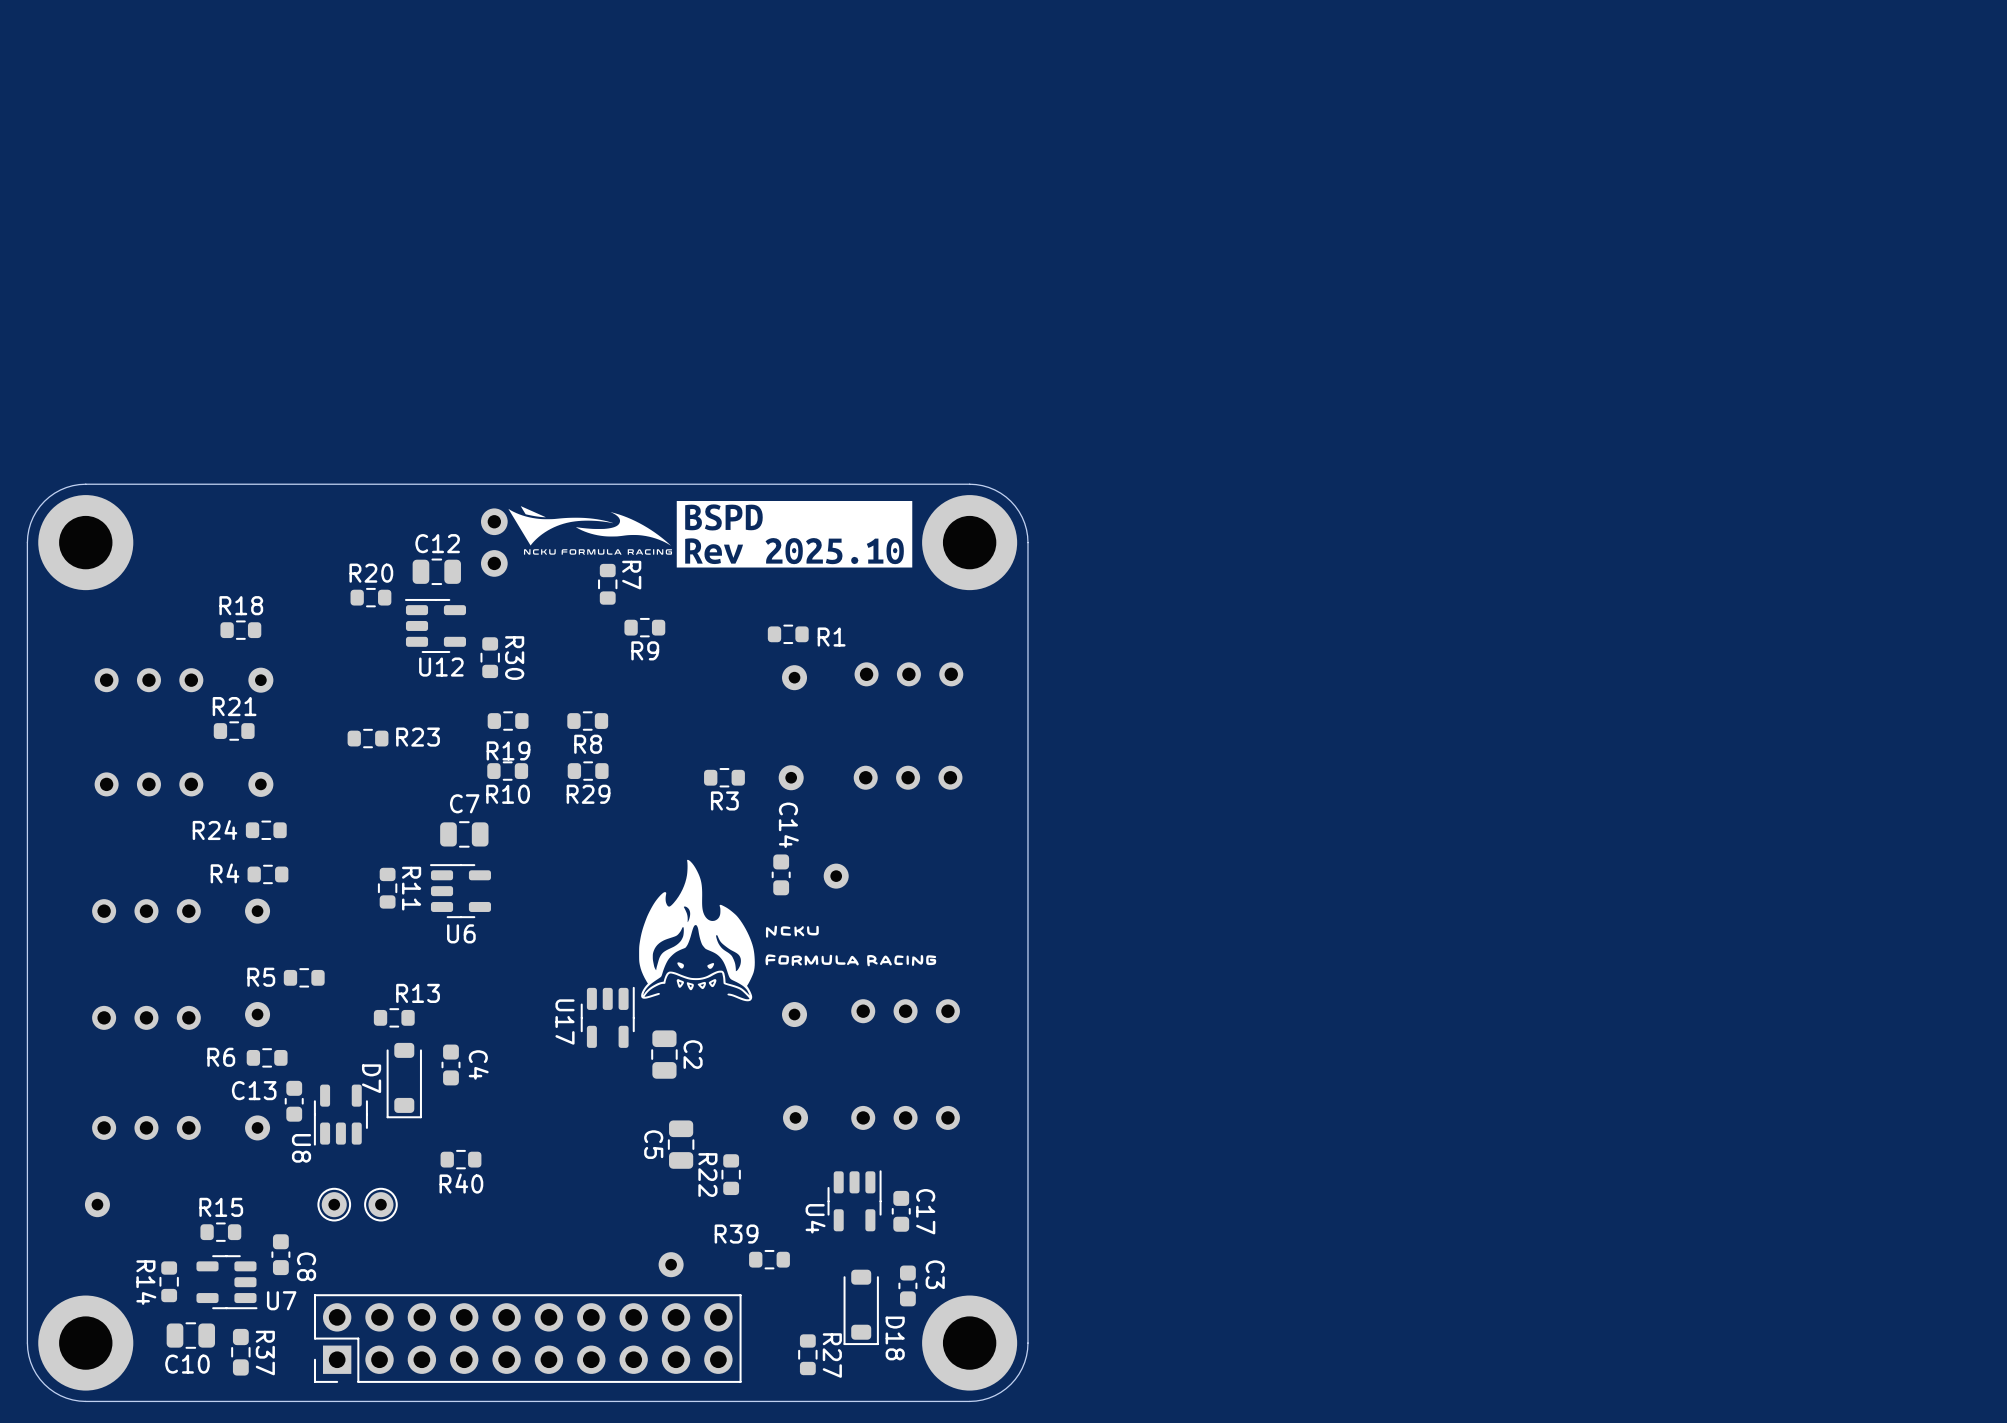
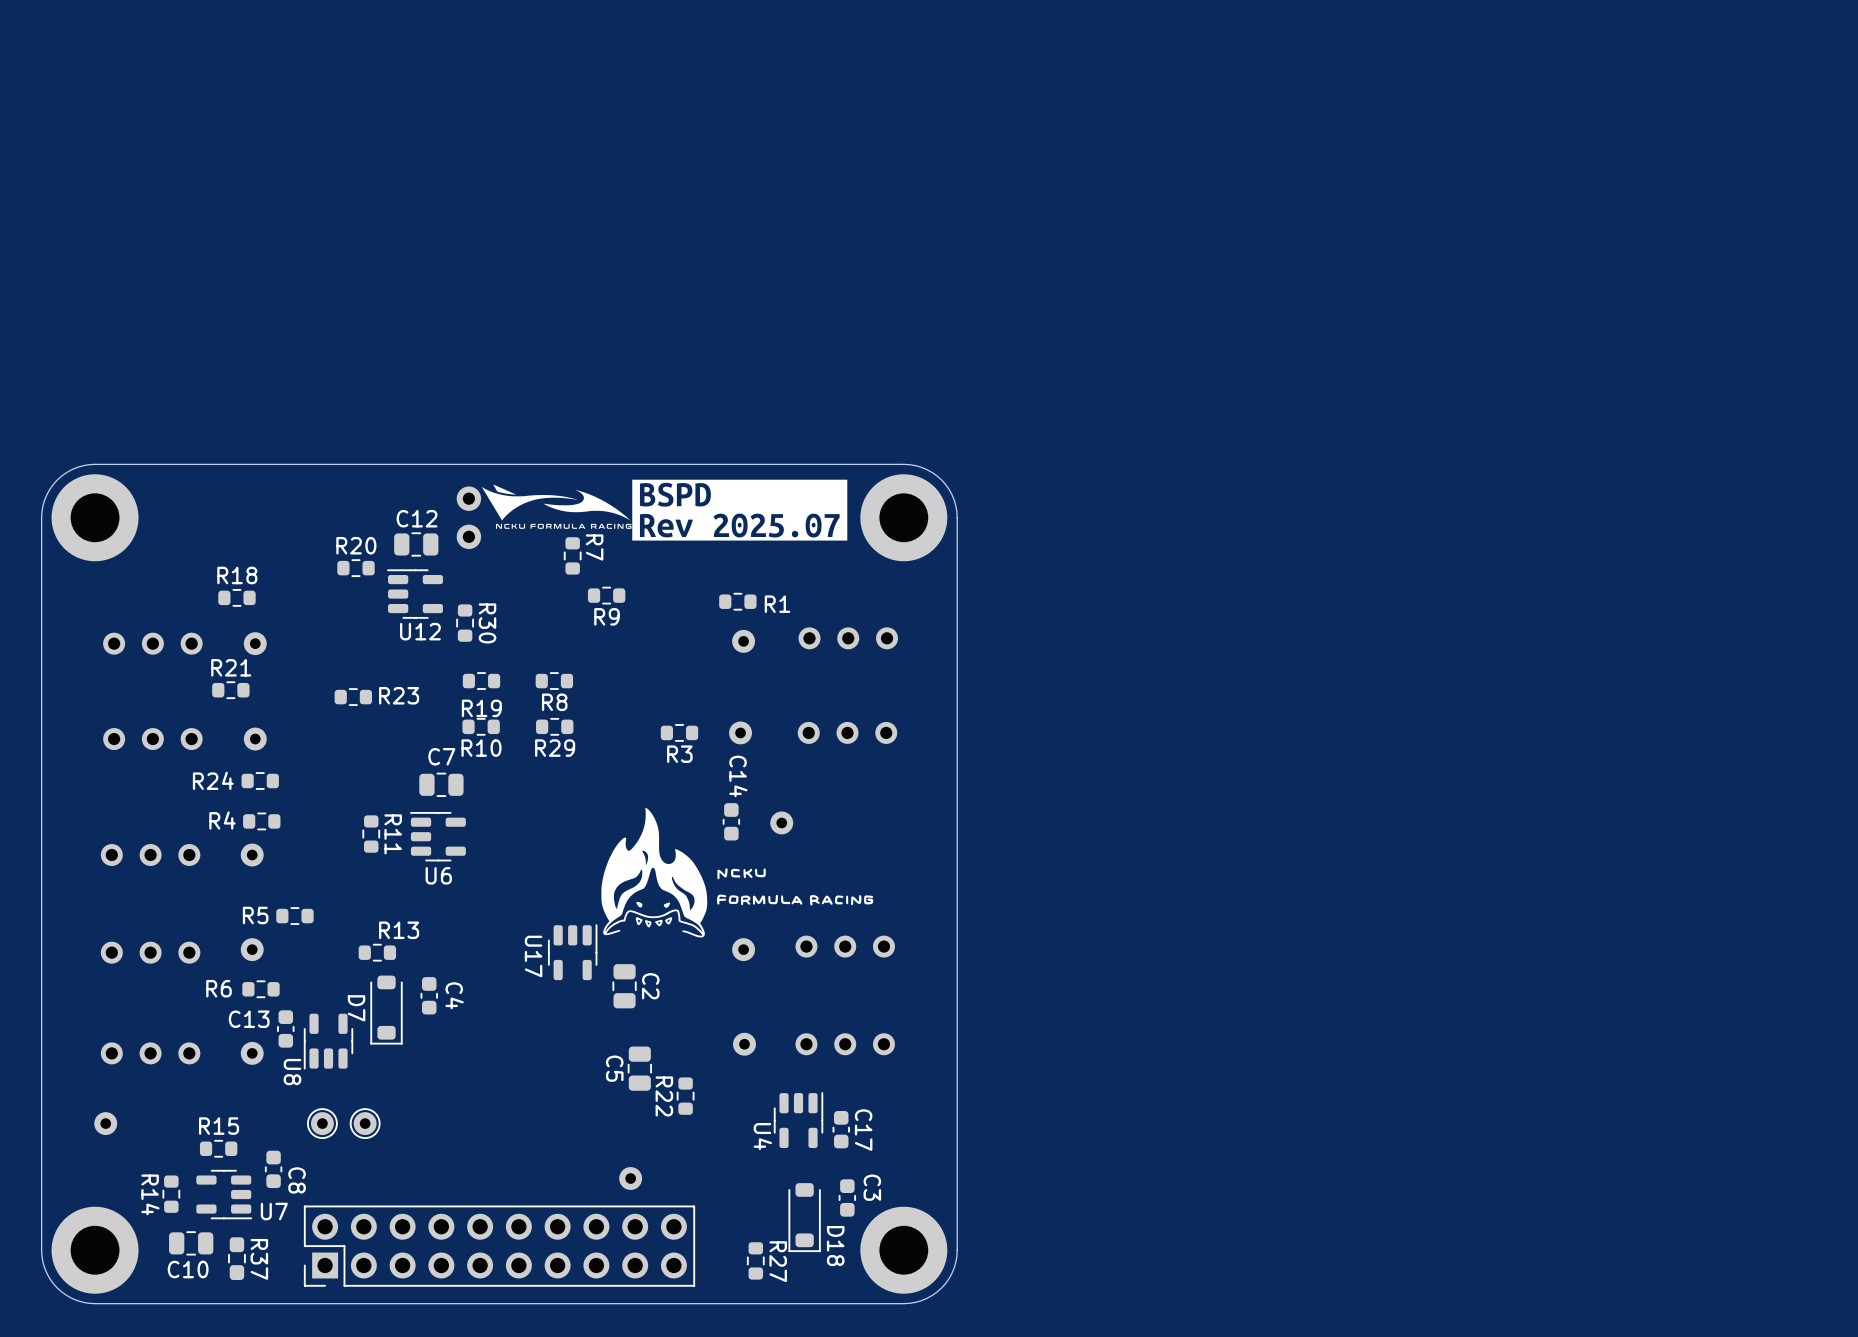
drawing shape: [676, 501, 913, 568] -> [632, 479, 848, 541]
R40: (460, 1159) -> none
R39: (769, 1259) -> none

